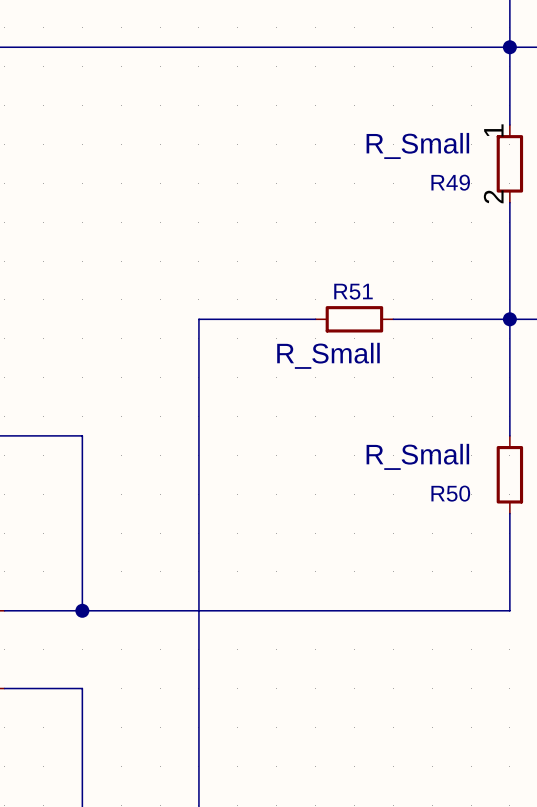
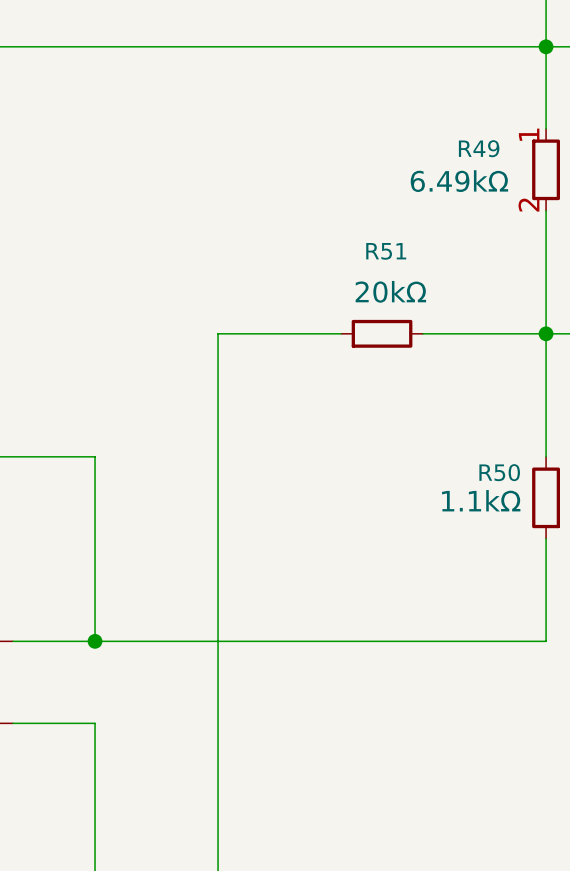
R49 value: R_Small (417, 145) -> 6.49kΩ (459, 181)
R49 name position: R49 (450, 182) -> R49 (479, 148)
R51 name position: R51 (353, 291) -> R51 (386, 251)
R51 value: R_Small (328, 355) -> 20kΩ (390, 291)
R50 value: R_Small (417, 456) -> 1.1kΩ (481, 500)
R50 name position: R50 (450, 493) -> R50 (499, 472)

